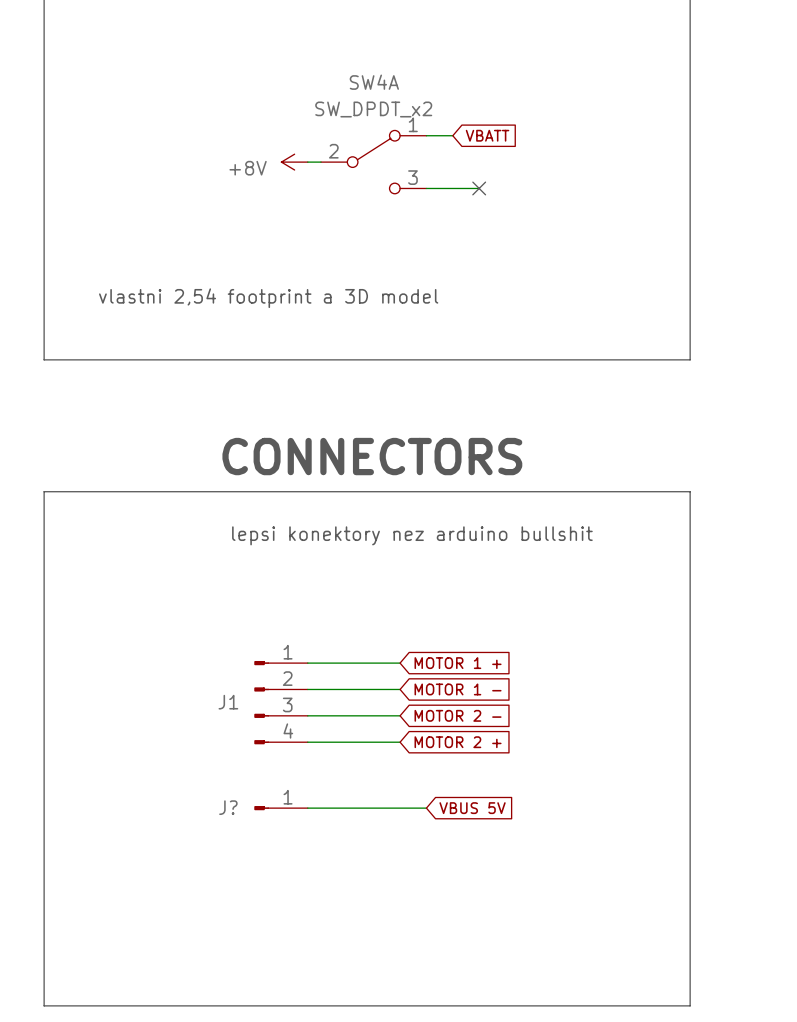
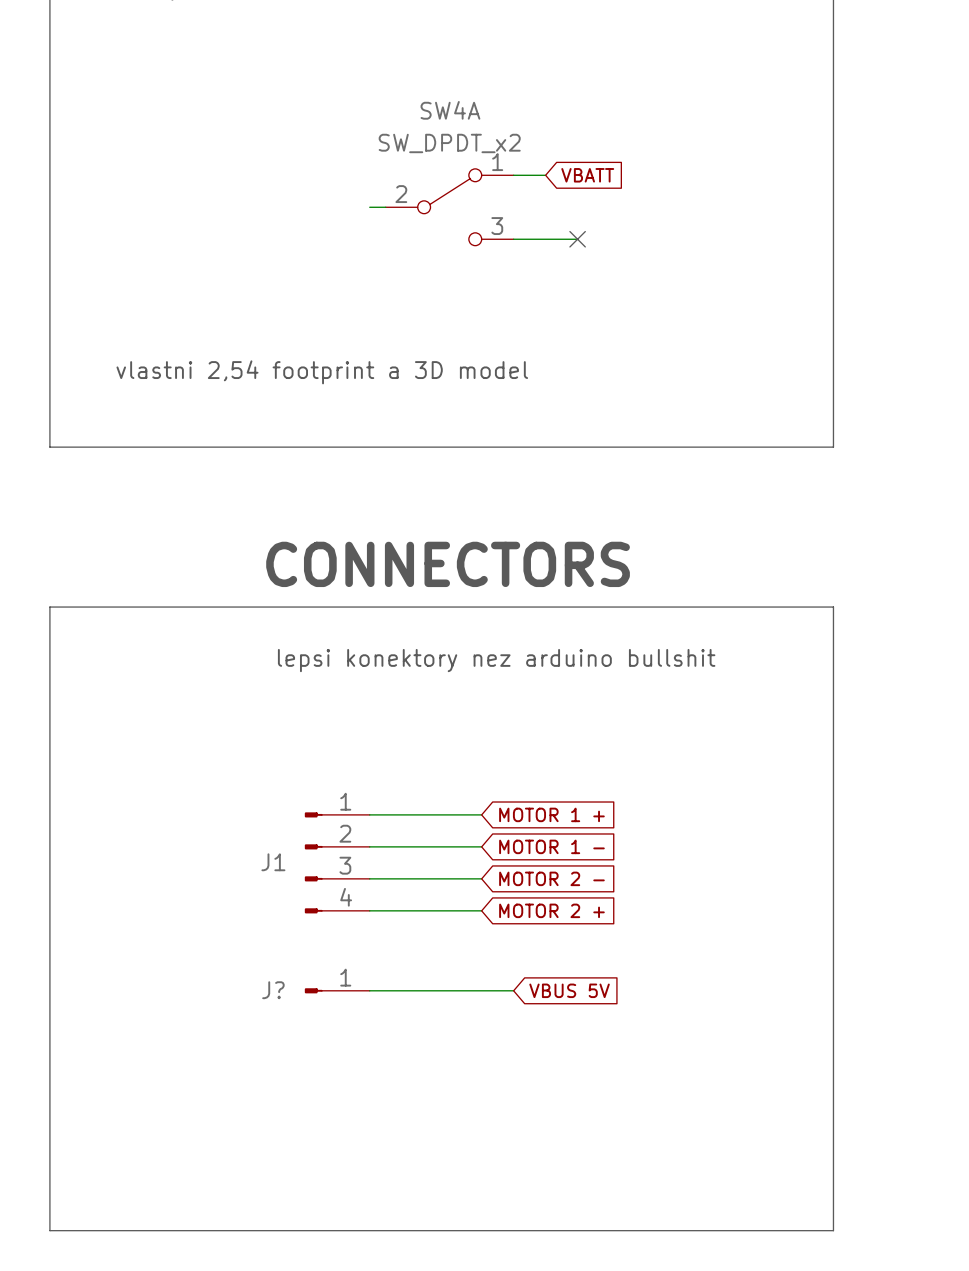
power symbol: +8V (294, 162) -> none

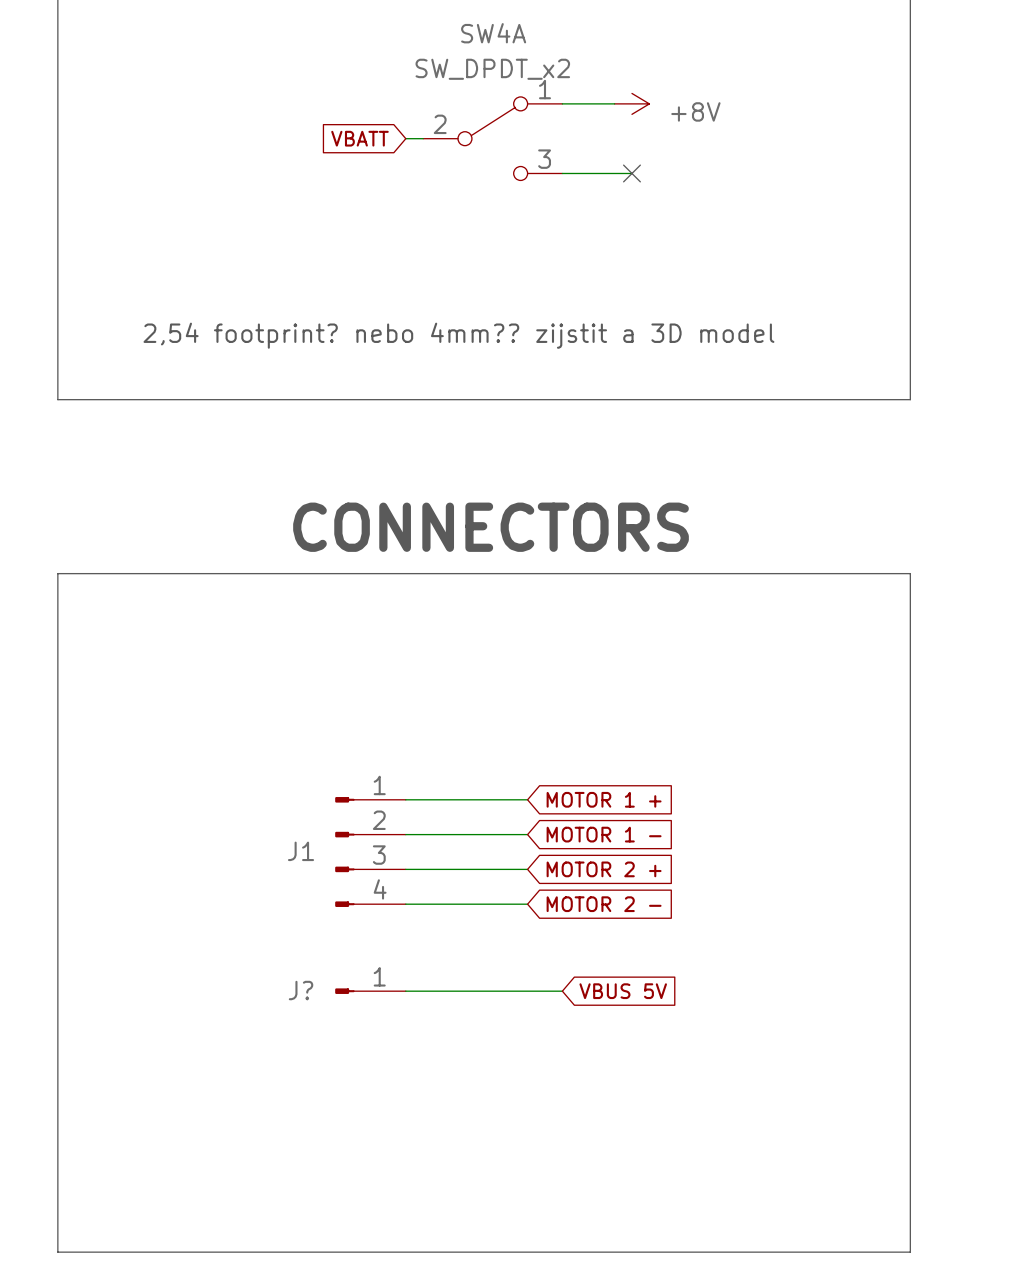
wire: none -> (597, 103) (614, 103)
power symbol: none -> +8V (631, 103)
global label rotation: 0° (587, 175) -> 180° (360, 138)
global label position: VBATT (587, 175) -> VBATT (360, 138)
text: vlastni 2,54 footprint a 3D model (322, 372) -> 2,54 footprint? nebo 4mm?? zijstit a 3D model (458, 335)
text: lepsi konektory nez arduino bullshit (496, 660) -> none
global label: MOTOR 2 - (551, 878) -> MOTOR 2 + (604, 869)
global label: MOTOR 2 + (551, 910) -> MOTOR 2 - (604, 904)

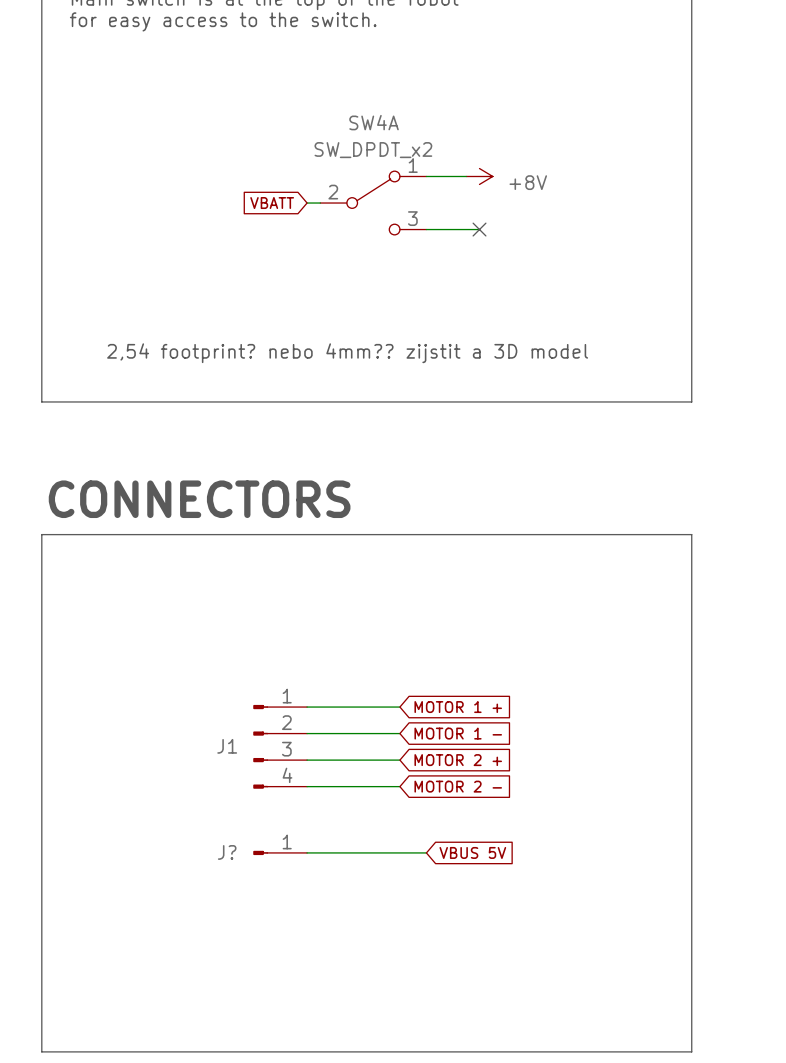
text position: CONNECTORS (491, 527) -> CONNECTORS (199, 499)

